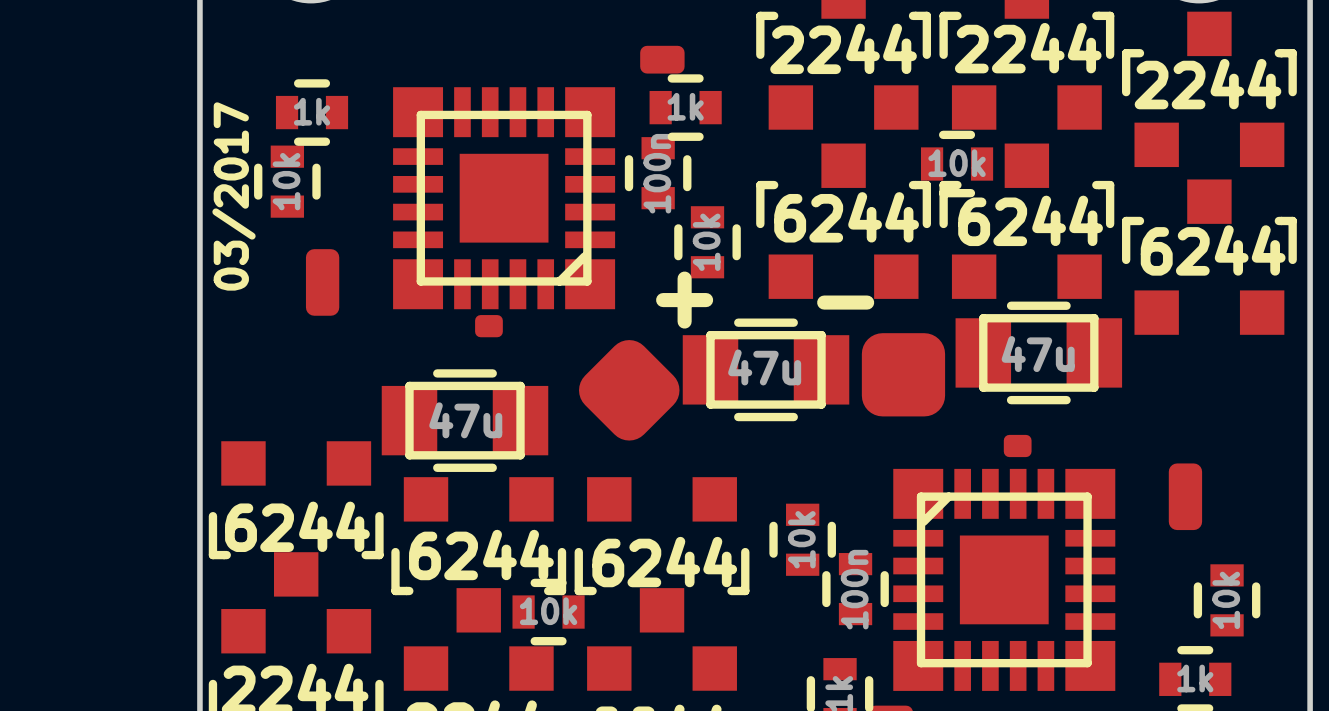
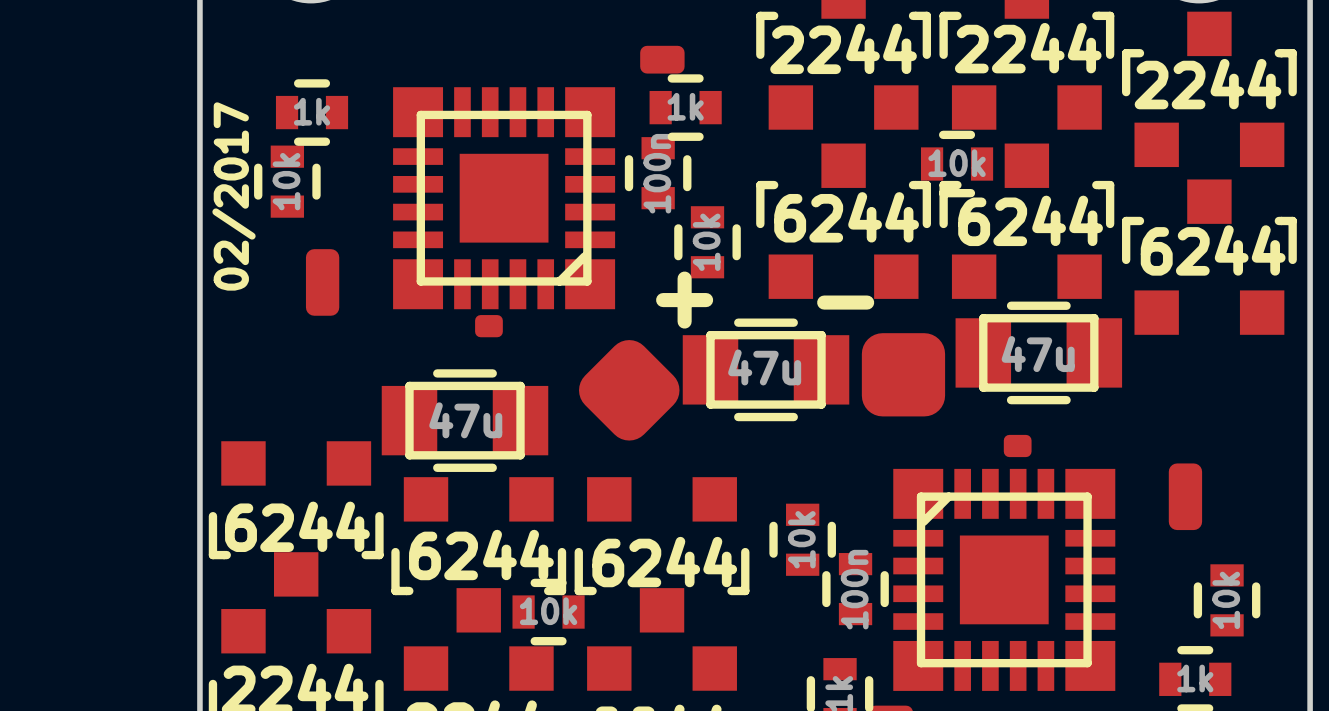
text: 03/2017 (234, 196) -> 02/2017 (234, 196)

